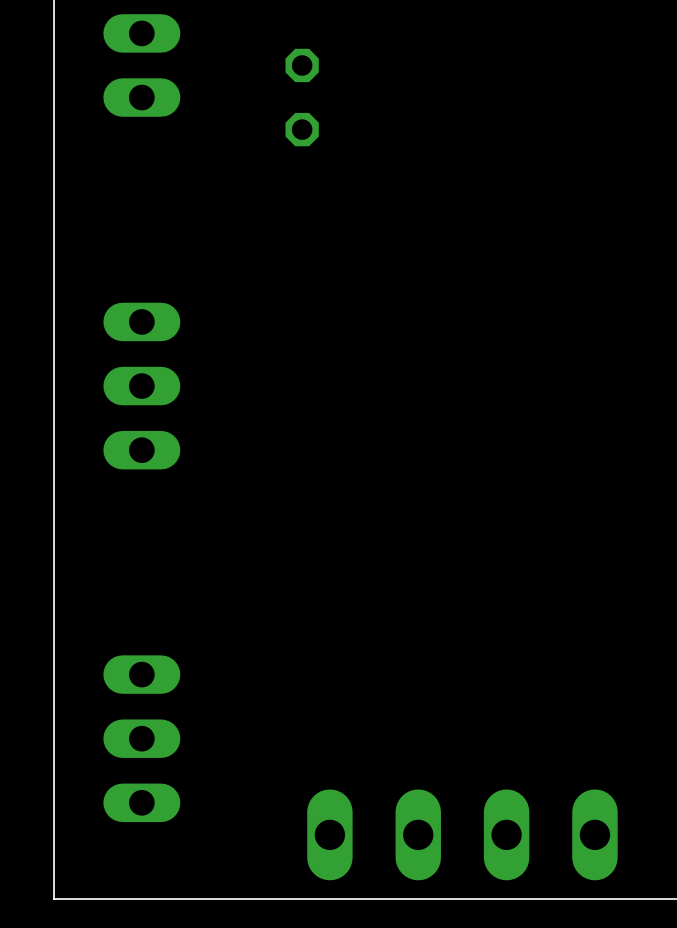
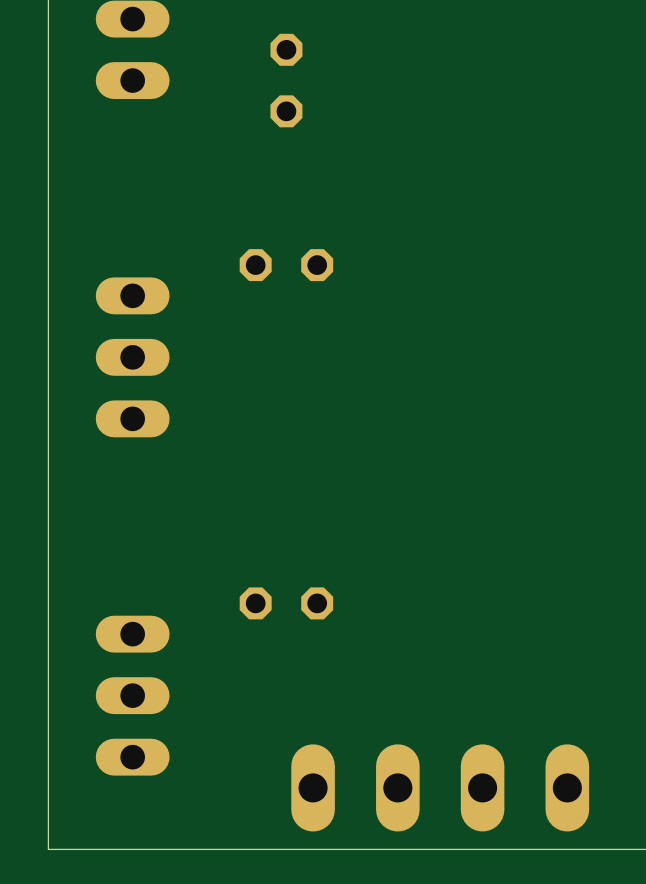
part: none -> (286, 265)
part: none -> (286, 603)

